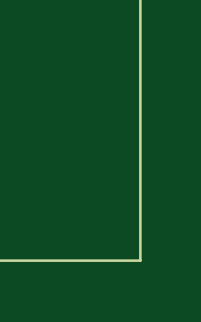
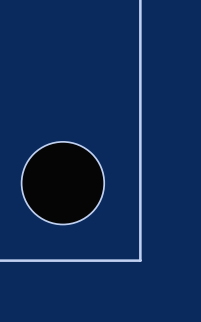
part: none -> (62, 183)

